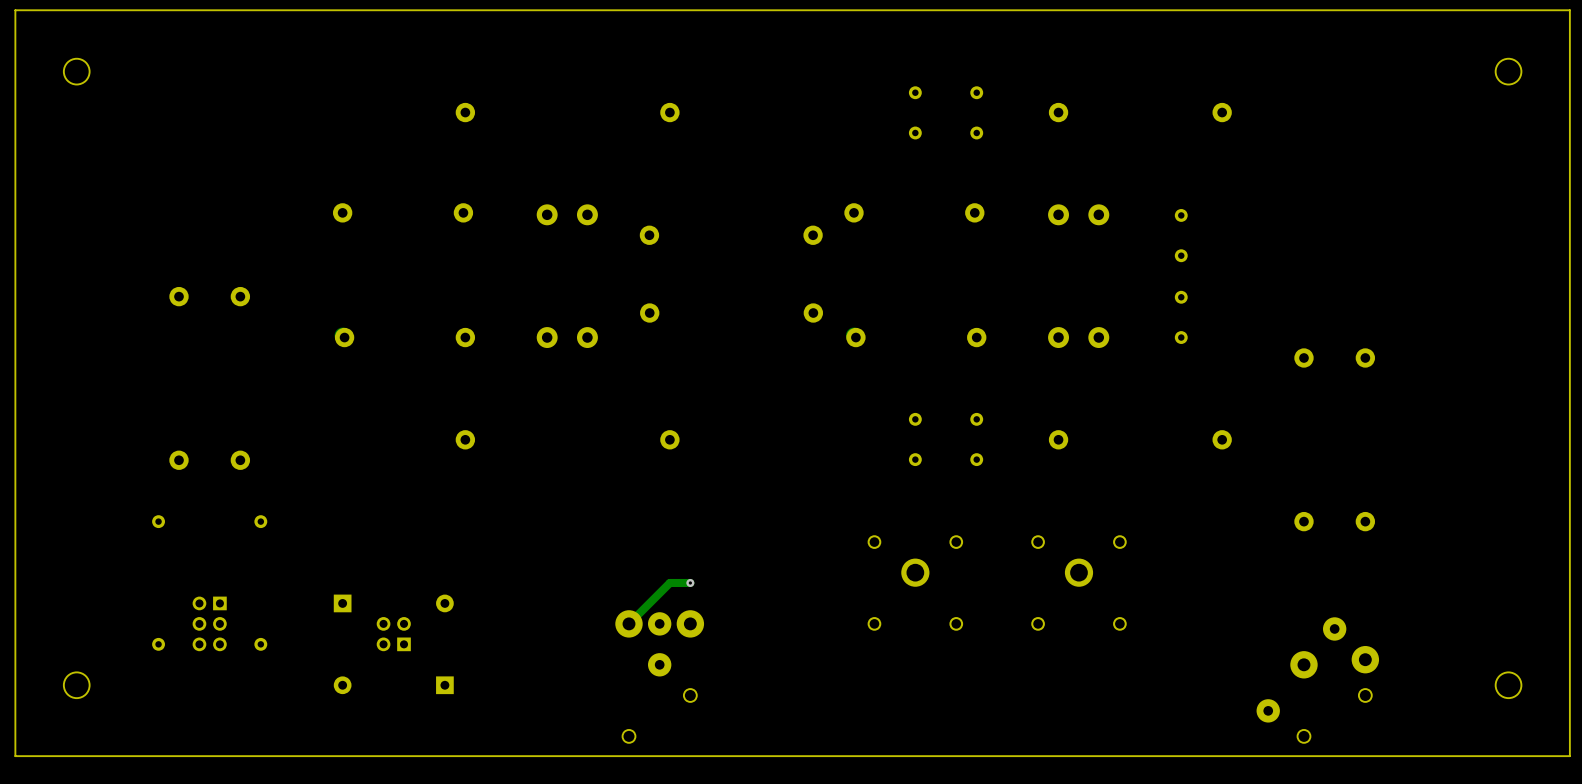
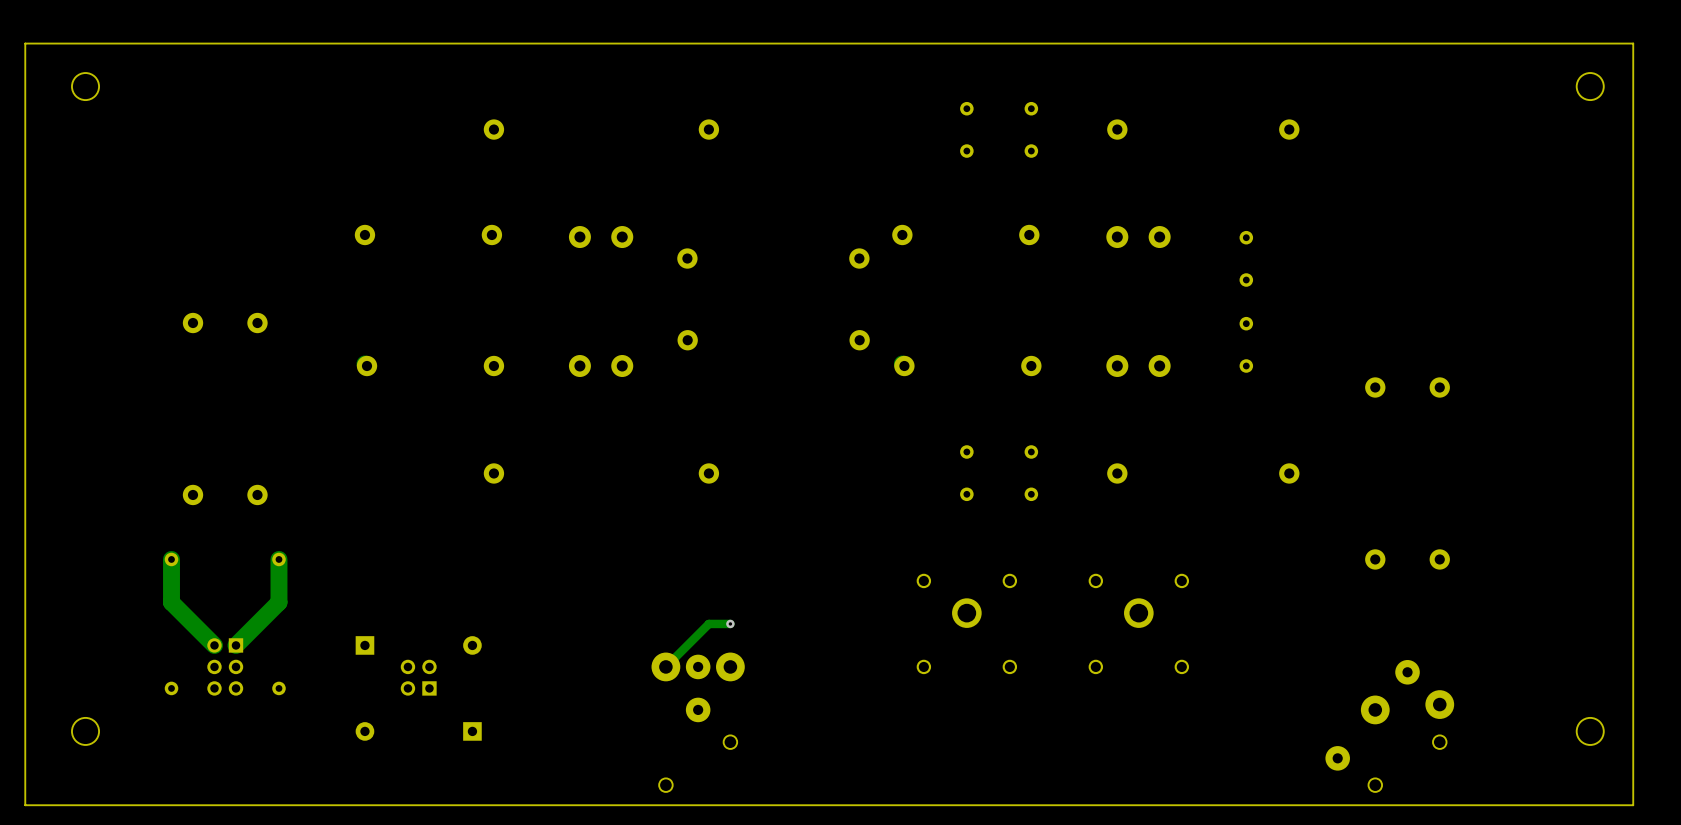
board edge: (1569, 10) (15, 10) (15, 756) (1569, 756) (1569, 10) -> (1633, 43) (1633, 805) (25, 805) (25, 43) (1633, 43)
track: none -> (171, 559) (171, 602) (214, 645)
track: none -> (278, 559) (278, 602) (235, 645)

